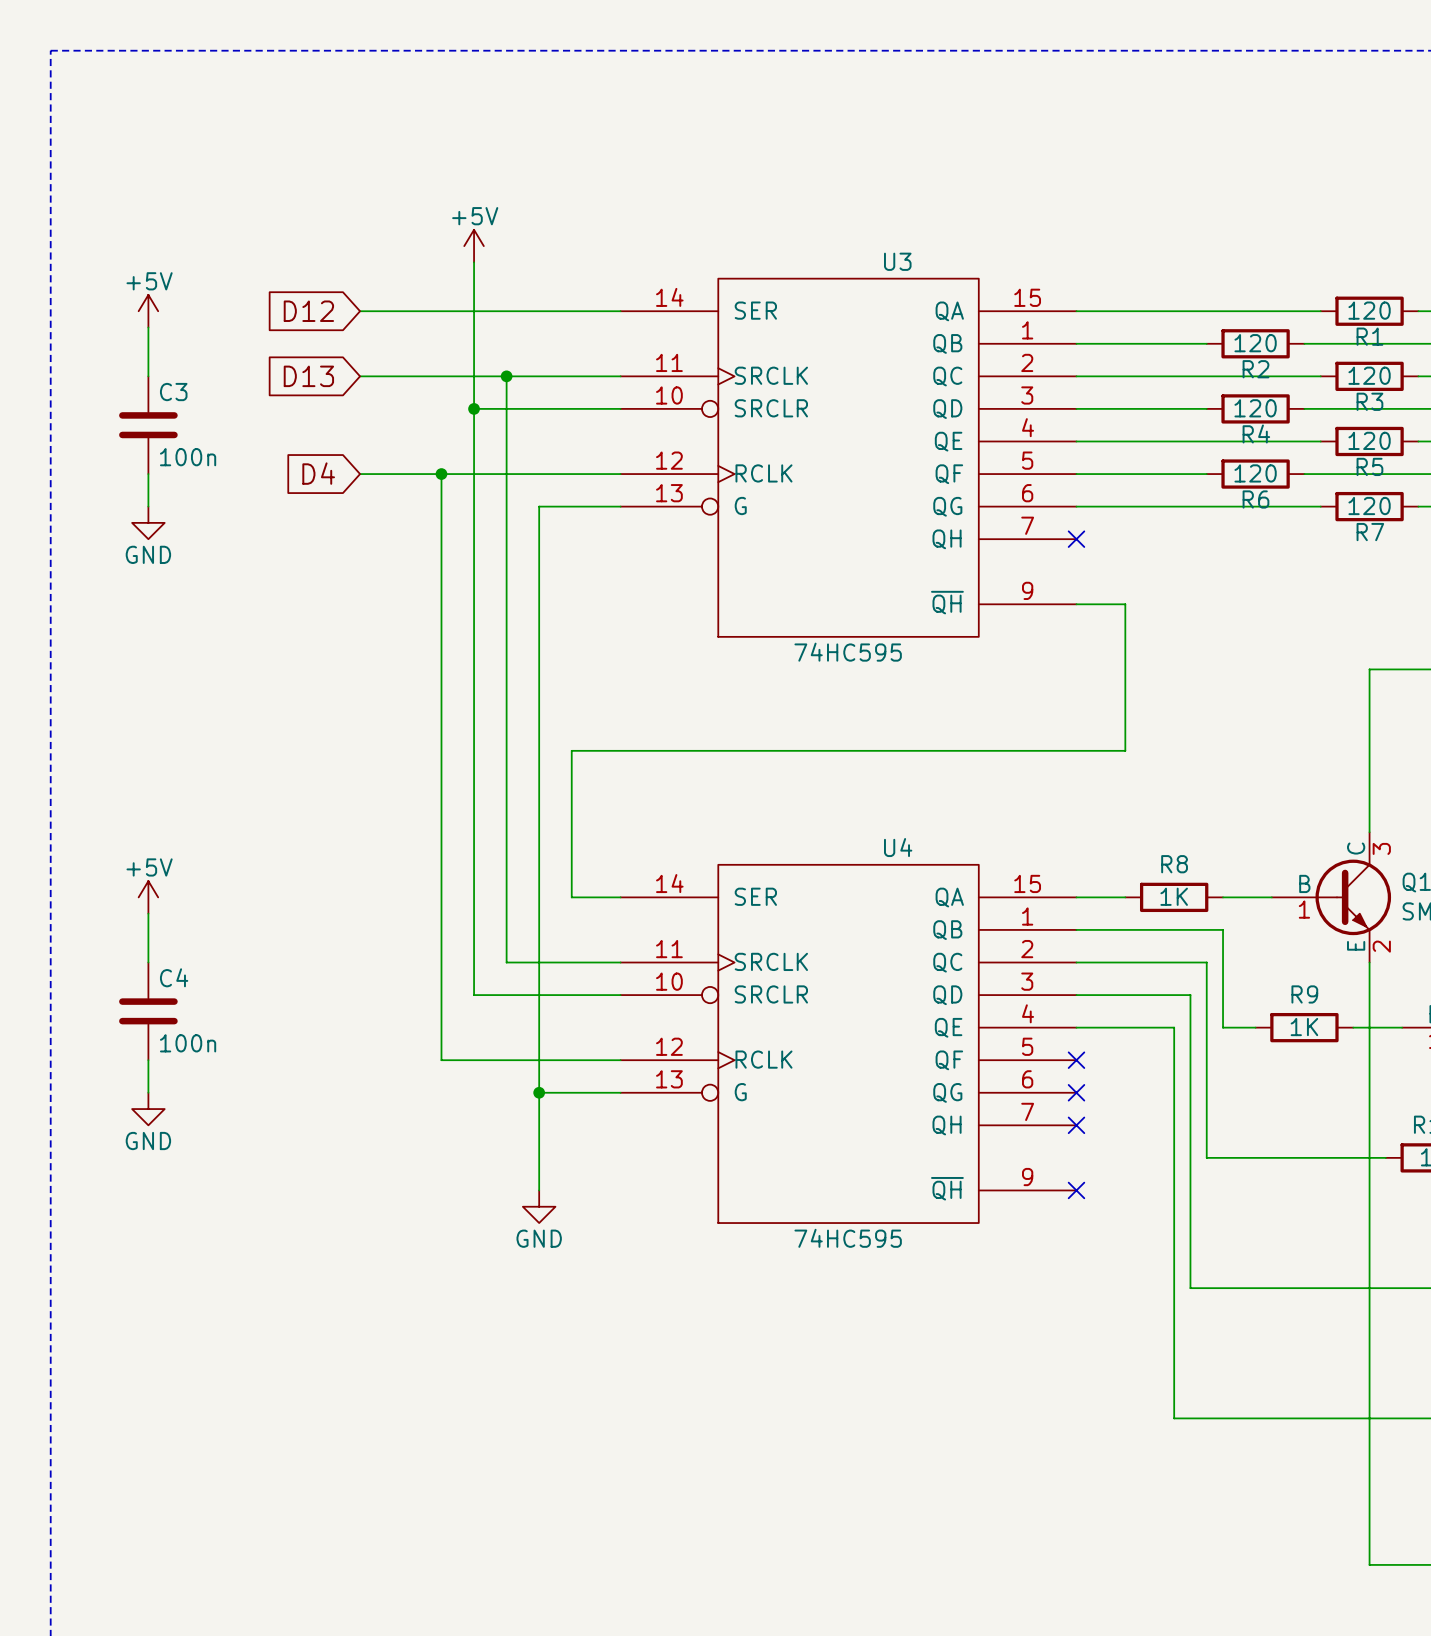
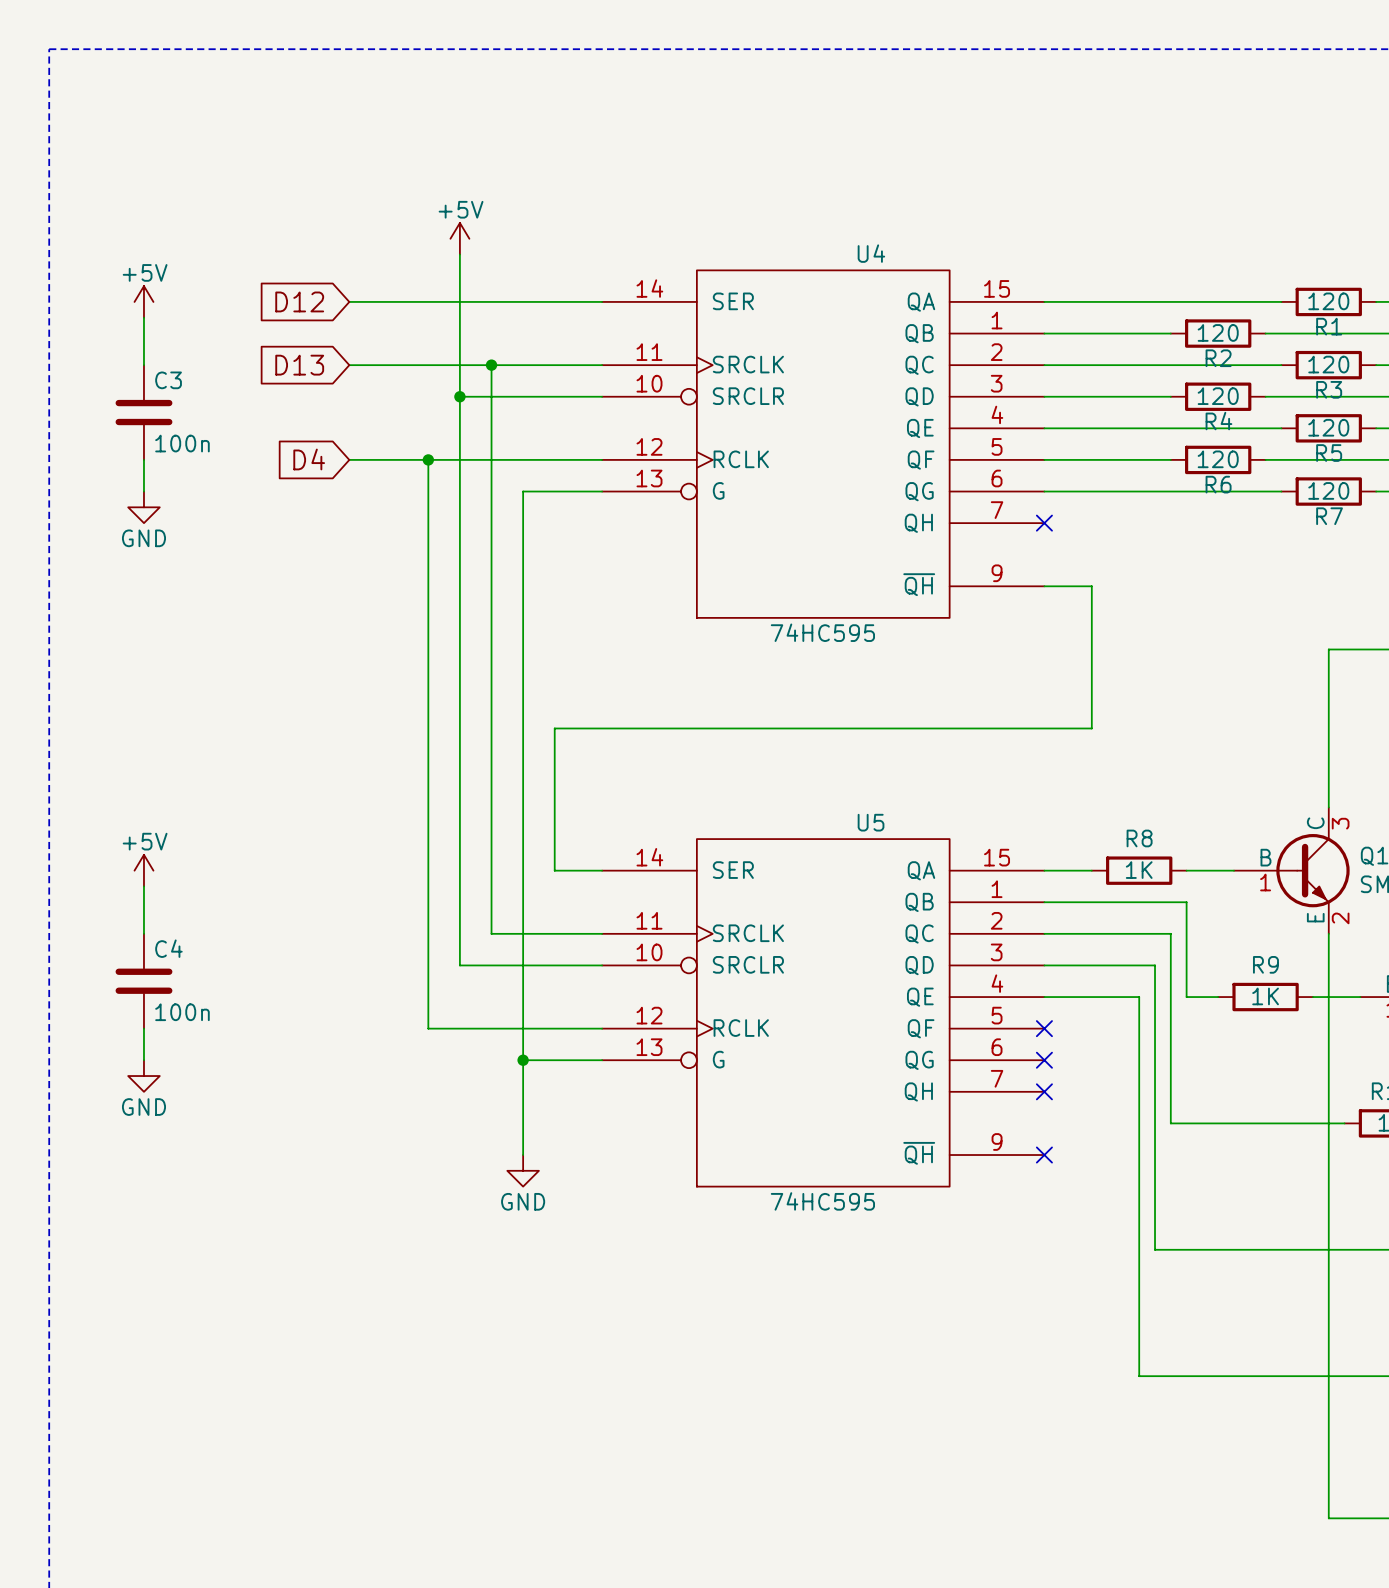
U3 name: U3 (897, 261) -> U4 (871, 253)
U4 name: U4 (898, 847) -> U5 (871, 822)

